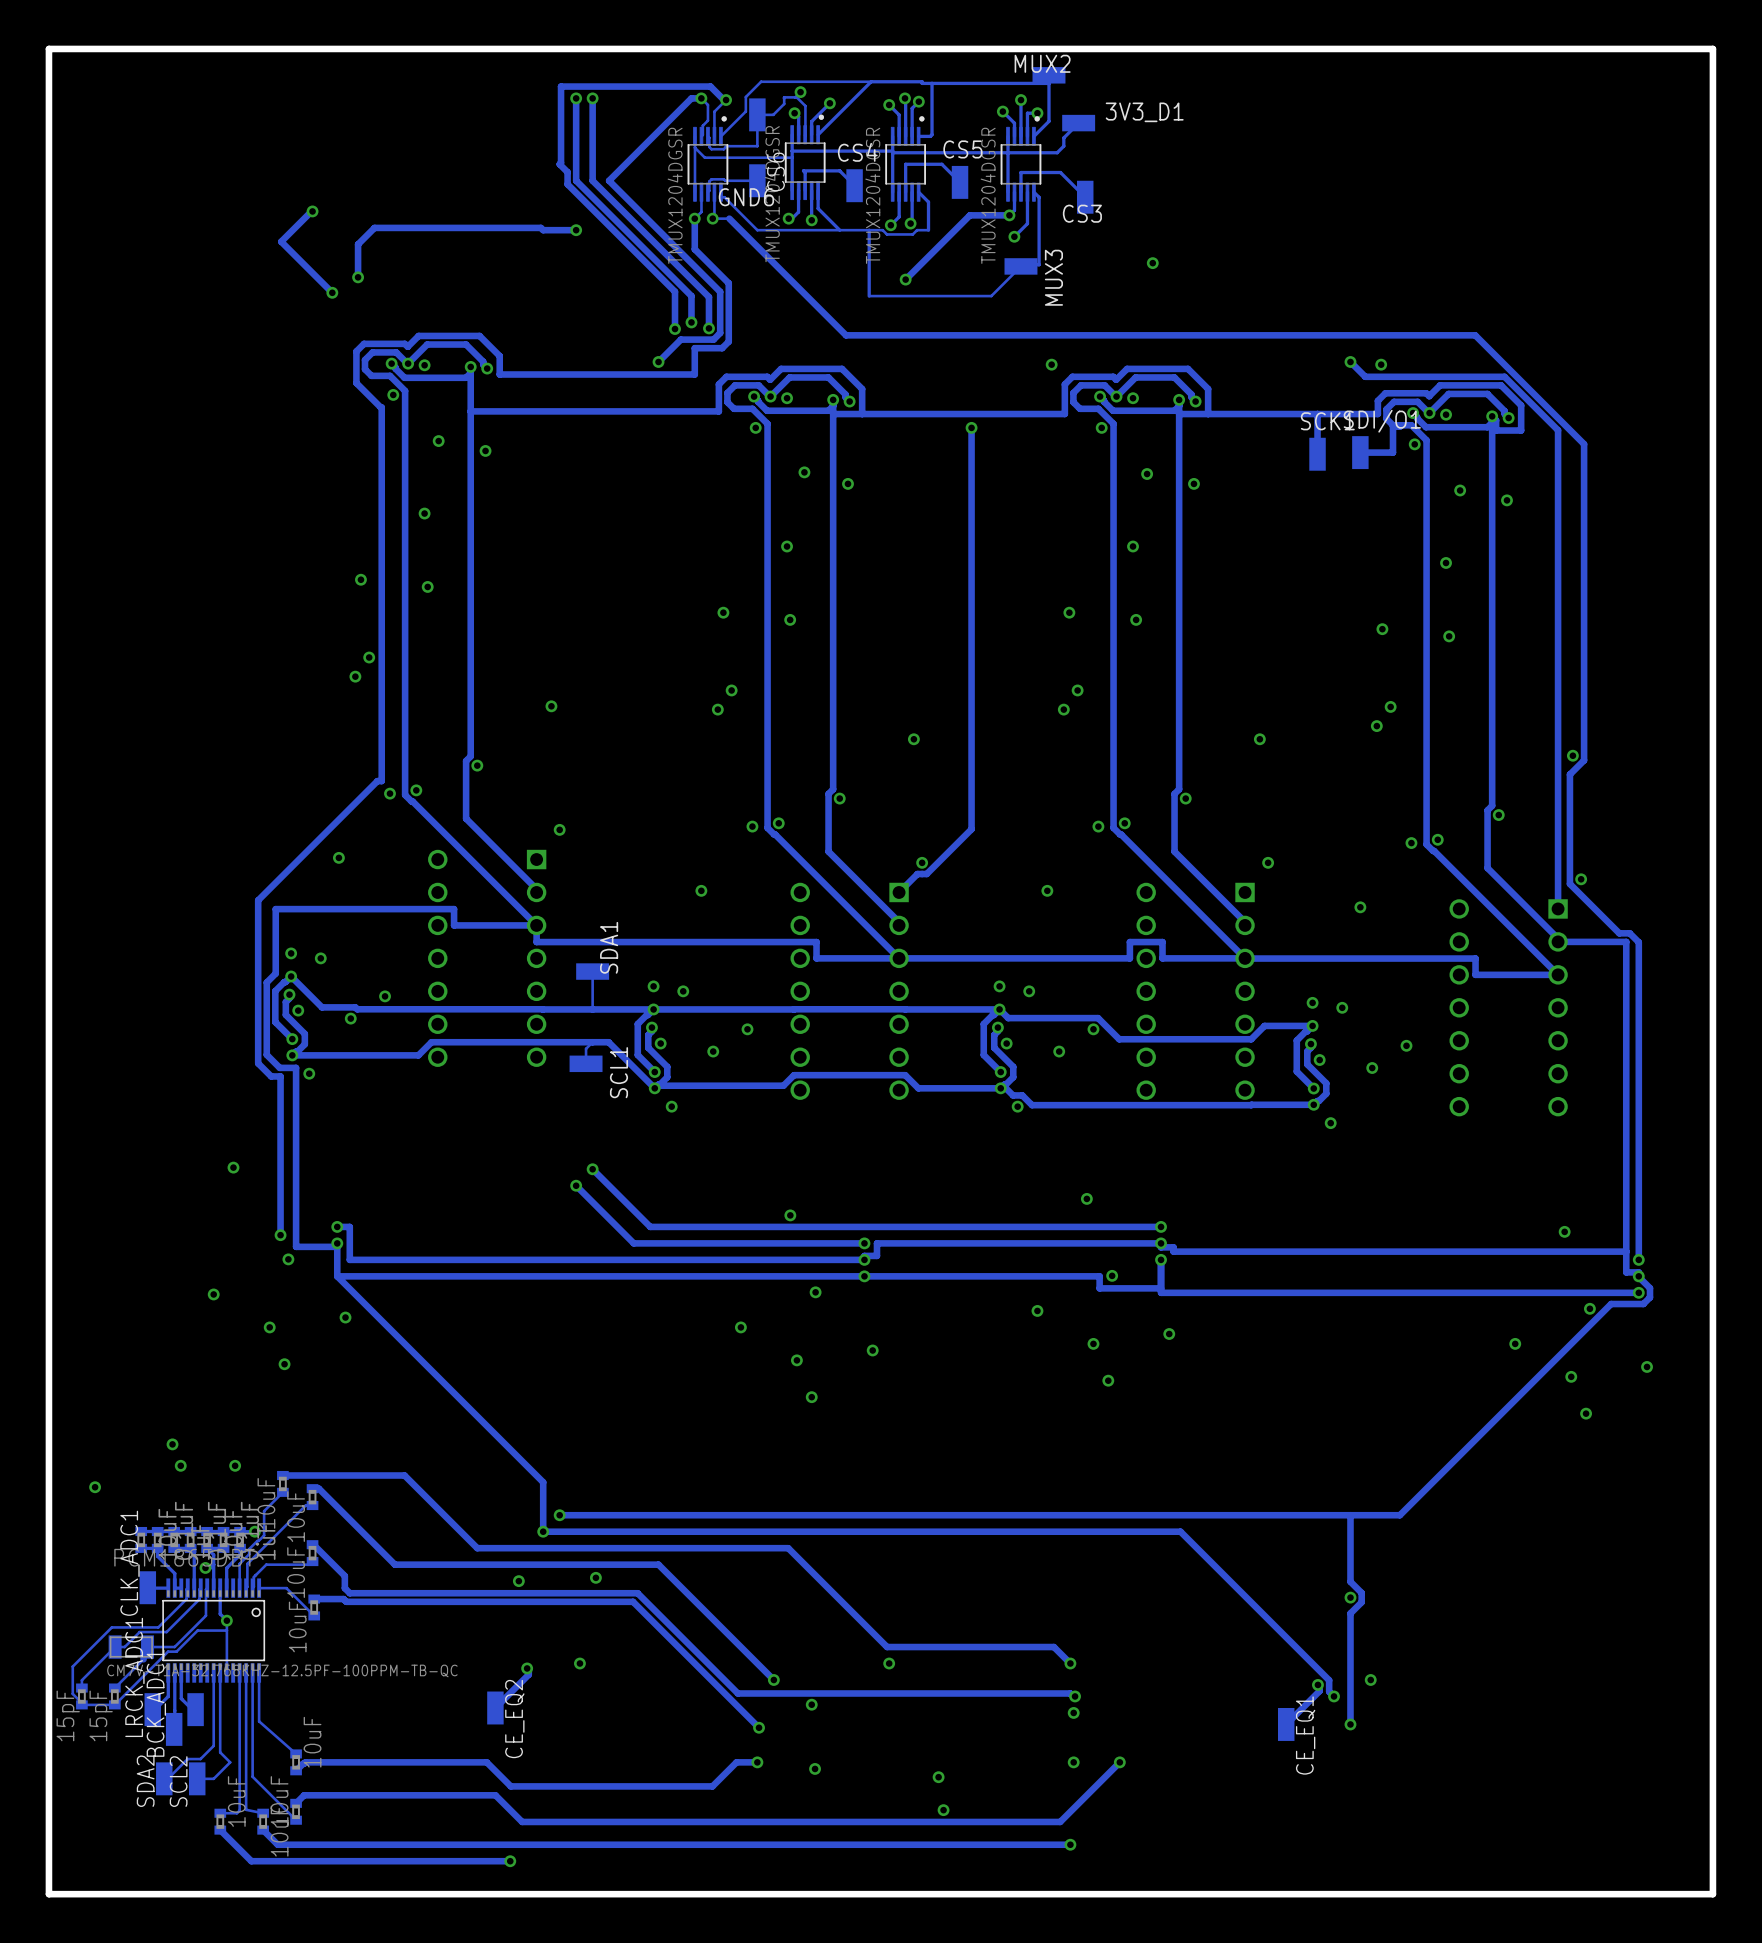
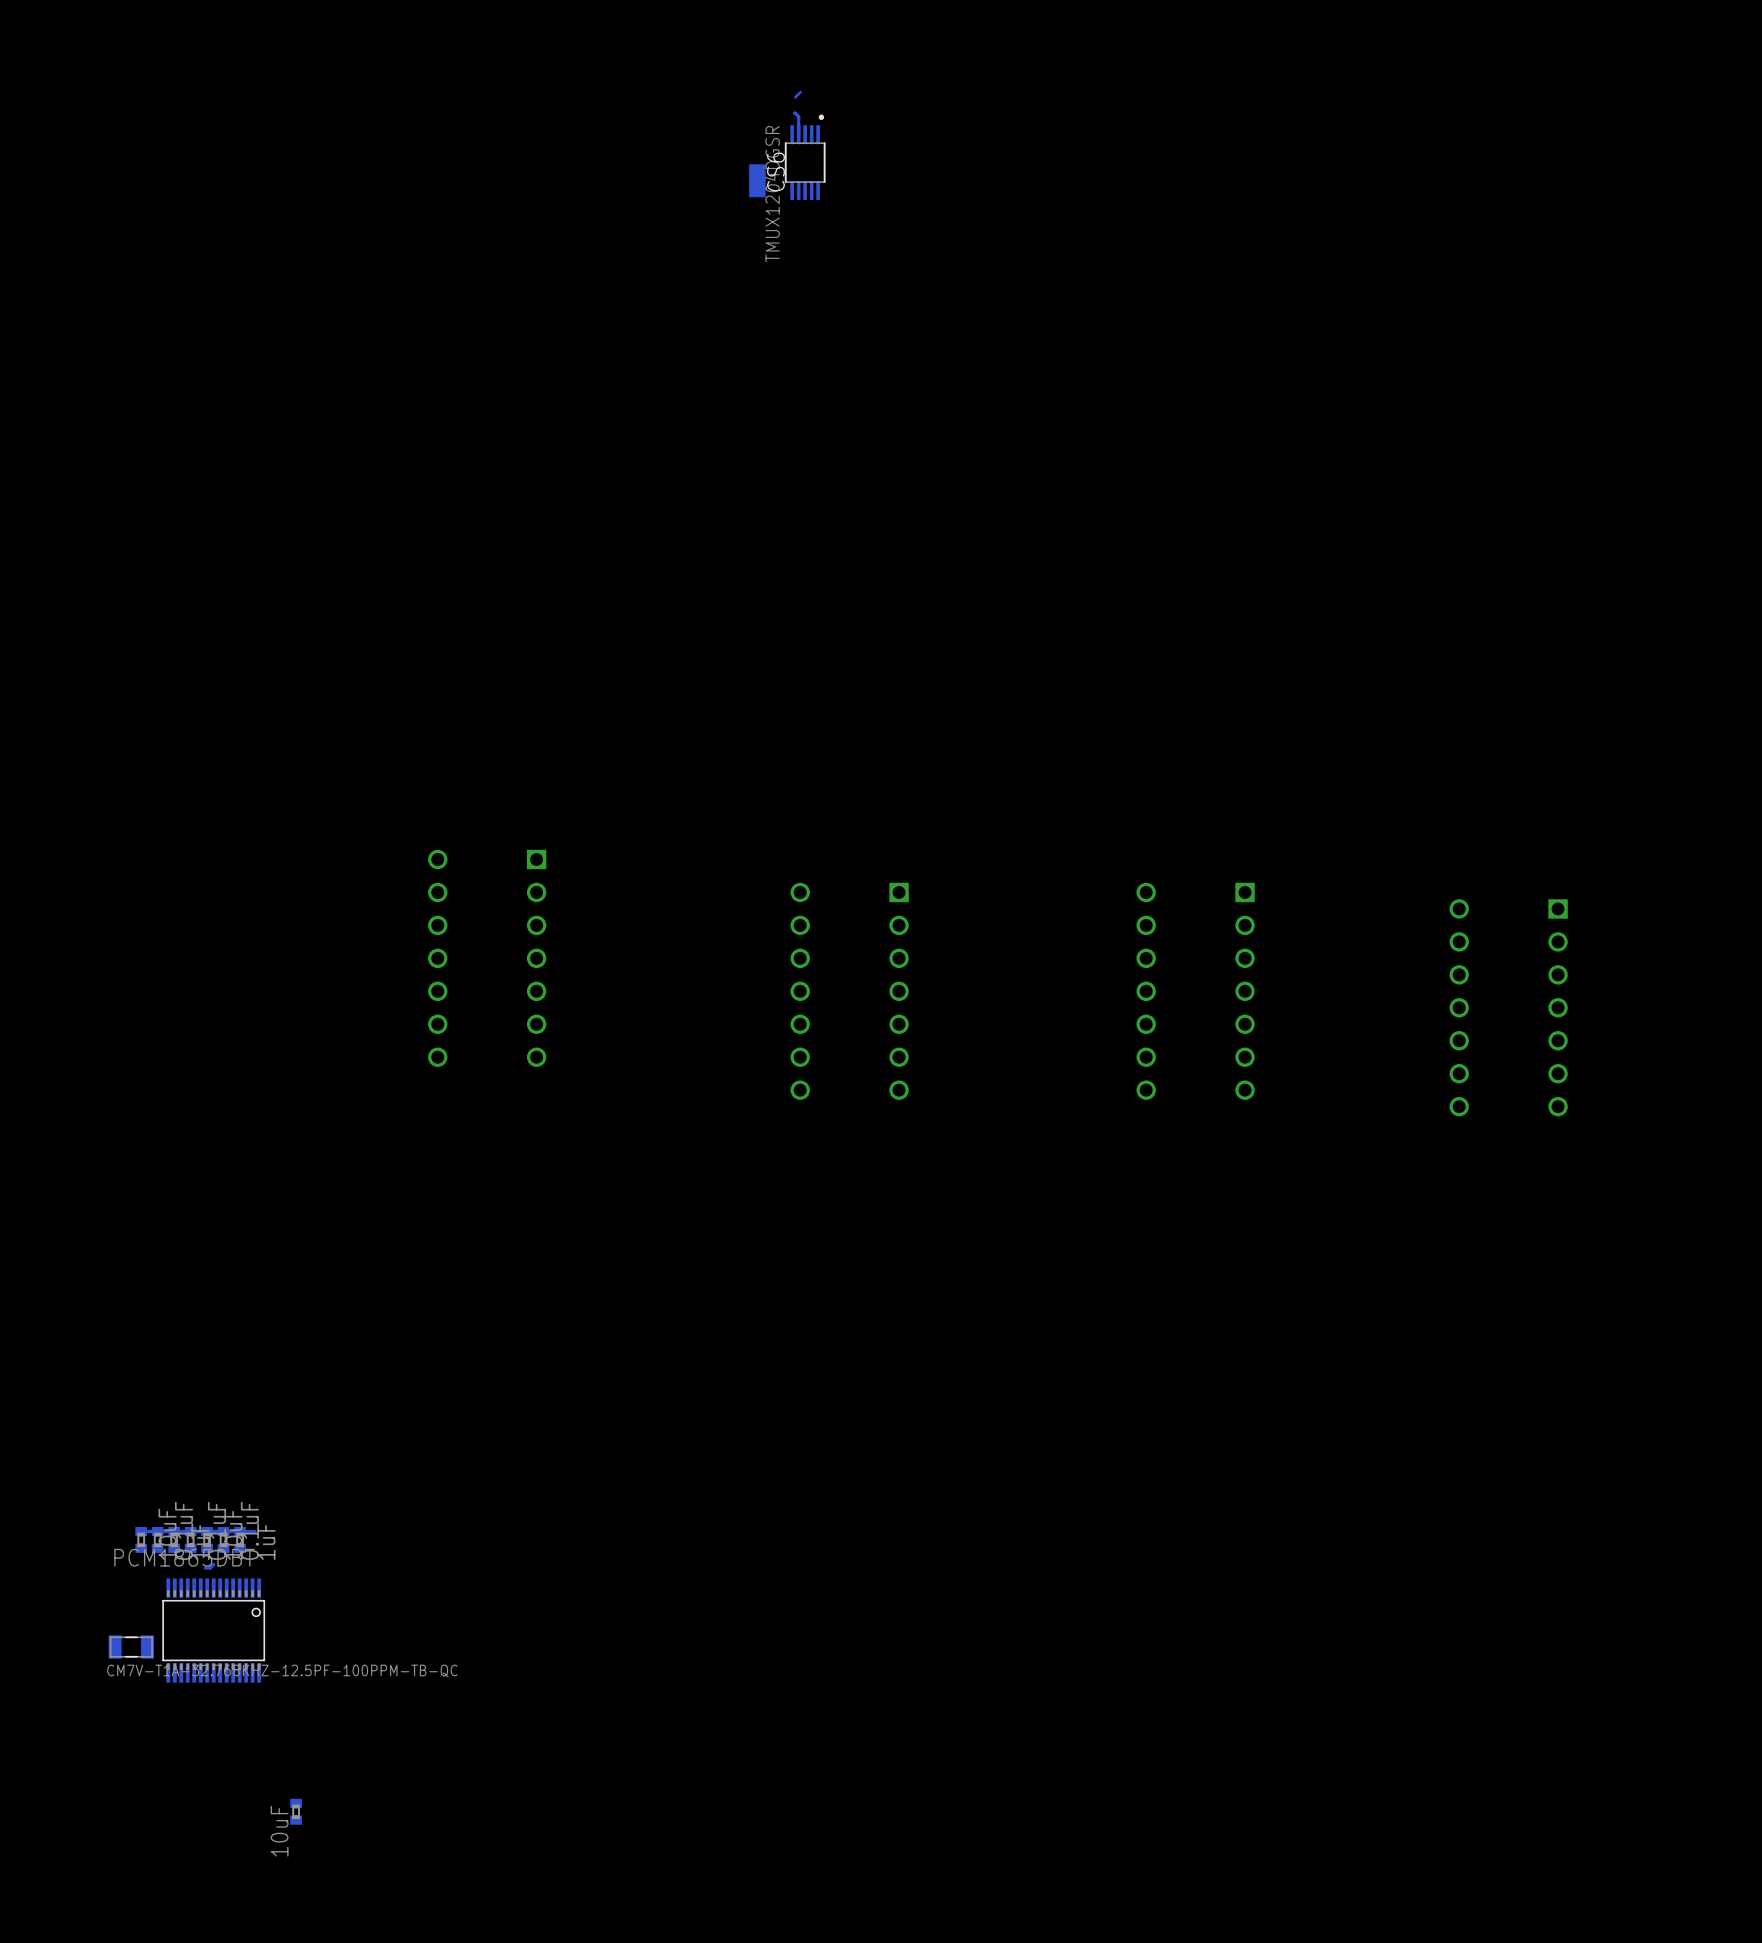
board edge: (1712, 48) (1712, 1894) (48, 1894) (48, 48) (1712, 48) -> none
track: (1048, 75) (1048, 121) (1033, 136) -> none
MUX2: (1048, 75) -> none
track: (871, 81) (761, 81) (745, 97) (745, 111) (720, 136) -> none
track: (871, 81) (1048, 83) -> none
track: (871, 81) (818, 134) -> none
track: (932, 83) (932, 134) (918, 136) -> none
via: (800, 92) -> none
track: (576, 98) (576, 180) (691, 296) (691, 322) -> none
via: (576, 98) -> none
track: (592, 98) (592, 180) (708, 297) (708, 328) -> none
via: (592, 98) -> none
via: (701, 98) -> none
track: (784, 98) (784, 103) (773, 114) (757, 114) (757, 146) (726, 146) (723, 149) (711, 149) (709, 147) (707, 136) -> none
track: (784, 98) (796, 97) (805, 106) (805, 134) -> none
track: (905, 98) (905, 136) -> none
via: (905, 98) -> none
via: (726, 100) -> none
track: (1020, 100) (1020, 136) -> none
via: (1020, 100) -> none
track: (918, 101) (912, 108) (912, 136) -> none
via: (918, 101) -> none
track: (829, 103) (811, 121) (811, 134) -> none
via: (829, 103) -> none
track: (889, 104) (899, 114) (899, 136) -> none
via: (889, 104) -> none
track: (1002, 111) (1014, 123) (1014, 136) -> none
via: (1002, 111) -> none
via: (794, 113) -> none
track: (1037, 113) (1027, 113) (1027, 136) -> none
via: (1037, 113) -> none
GND6: (757, 114) -> none
track: (1078, 123) (1063, 137) (1063, 146) (1057, 152) (892, 152) -> none
3V3_D1: (1078, 123) -> none
track: (792, 134) (792, 190) -> none
track: (694, 136) (694, 192) -> none
track: (701, 136) (702, 125) (707, 120) (707, 104) (701, 98) (691, 98) (609, 180) (720, 291) (720, 333) (713, 339) (680, 339) (658, 361) -> none
track: (714, 136) (714, 111) (726, 100) (710, 86) (561, 86) (559, 164) (567, 172) (567, 184) (675, 291) (675, 329) -> none
track: (892, 136) (892, 192) -> none
track: (1008, 136) (1008, 192) -> none
track: (694, 147) (704, 157) (792, 157) -> none
track: (892, 151) (792, 151) -> none
part: TMUX1204DGSR (707, 158) -> none
part: TMUX1204DGSR (905, 158) -> none
part: TMUX1204DGSR (1020, 158) -> none
track: (757, 180) (711, 179) (709, 181) (707, 192) -> none
track: (960, 182) (941, 164) (905, 164) (905, 192) -> none
CS5: (960, 182) -> none
track: (854, 185) (839, 170) (803, 170) (805, 172) (805, 190) -> none
CS4: (854, 185) -> none
track: (798, 190) (798, 212) (791, 218) (788, 218) -> none
track: (811, 190) (811, 220) -> none
track: (818, 190) (818, 208) (839, 230) -> none
track: (701, 192) (701, 211) (694, 218) (694, 249) (728, 283) (728, 341) (722, 348) (694, 348) (694, 374) (499, 374) (499, 356) (479, 335) (418, 335) (407, 346) (404, 343) (364, 343) (356, 351) (356, 383) (381, 407) (381, 781) (377, 781) (258, 900) (258, 1063) (271, 1076) (280, 1076) (280, 1235) -> none
track: (714, 192) (712, 218) -> none
track: (899, 192) (899, 216) (890, 225) -> none
track: (912, 192) (910, 223) -> none
track: (918, 192) (928, 202) (928, 230) (917, 230) (912, 234) (887, 234) (882, 230) (757, 230) (724, 197) (720, 197) (720, 192) -> none
track: (1014, 192) (1014, 210) (1009, 215) (969, 215) (905, 279) -> none
track: (1020, 192) (1020, 172) (1060, 172) (1085, 197) -> none
track: (1027, 192) (1027, 223) (1014, 236) -> none
track: (1033, 192) (1039, 197) (1039, 264) (1022, 264) (991, 296) (869, 296) (869, 230) -> none
CS3: (1085, 197) -> none
track: (312, 211) (281, 241) (332, 292) -> none
via: (312, 211) -> none
via: (1009, 215) -> none
via: (694, 218) -> none
track: (712, 218) (729, 218) (846, 335) (1475, 335) (1584, 444) (1584, 760) (1569, 774) (1569, 883) (1619, 933) (1629, 933) (1638, 942) (1638, 1259) -> none
via: (712, 218) -> none
via: (788, 218) -> none
via: (811, 220) -> none
via: (910, 223) -> none
via: (890, 225) -> none
track: (576, 230) (543, 230) (540, 227) (374, 227) (358, 244) (358, 277) -> none
via: (576, 230) -> none
via: (1014, 236) -> none
via: (1152, 263) -> none
MUX3: (1020, 266) -> none
via: (358, 277) -> none
via: (905, 279) -> none
via: (332, 292) -> none
via: (691, 322) -> none
via: (708, 328) -> none
via: (675, 329) -> none
via: (658, 361) -> none
track: (1350, 361) (1365, 376) (1504, 376) (1558, 430) (1558, 908) -> none
via: (1350, 361) -> none
track: (391, 363) (404, 377) (466, 377) (470, 373) -> none
via: (391, 363) -> none
via: (408, 363) -> none
via: (1051, 364) -> none
via: (1381, 364) -> none
via: (424, 365) -> none
track: (470, 366) (470, 756) (466, 760) (466, 818) (536, 889) (536, 892) -> none
via: (470, 366) -> none
track: (487, 368) (483, 361) (466, 344) (427, 344) (408, 363) (396, 352) (372, 352) (364, 360) (364, 369) (371, 375) (390, 375) (405, 390) (405, 795) (536, 925) -> none
via: (487, 368) -> none
via: (393, 394) -> none
track: (754, 396) (767, 410) (828, 410) (833, 406) -> none
via: (754, 396) -> none
via: (770, 396) -> none
track: (1100, 396) (1113, 410) (1174, 410) (1179, 406) -> none
via: (1100, 396) -> none
via: (1116, 396) -> none
via: (787, 398) -> none
via: (1133, 398) -> none
track: (833, 399) (833, 789) (828, 793) (828, 851) (899, 922) (899, 925) -> none
via: (833, 399) -> none
track: (1179, 399) (1179, 789) (1174, 793) (1174, 851) (1245, 922) (1245, 925) -> none
via: (1179, 399) -> none
track: (849, 401) (845, 394) (828, 377) (789, 377) (770, 396) (758, 385) (735, 385) (727, 392) (727, 402) (734, 408) (752, 408) (767, 423) (767, 827) (899, 958) -> none
via: (849, 401) -> none
track: (1195, 401) (1191, 394) (1174, 377) (1135, 377) (1116, 396) (1104, 385) (1081, 385) (1073, 392) (1073, 402) (1079, 408) (1098, 408) (1113, 423) (1113, 827) (1245, 958) (1162, 958) (1162, 942) (1129, 942) (1129, 958) (816, 958) (816, 942) (536, 942) (536, 925) -> none
via: (1195, 401) -> none
track: (470, 411) (718, 411) (718, 384) (726, 376) (767, 376) (770, 379) (781, 368) (842, 368) (862, 389) (862, 414) -> none
track: (1413, 413) (1426, 427) (1487, 427) (1492, 422) -> none
via: (1413, 413) -> none
via: (1429, 413) -> none
track: (1179, 414) (1377, 414) (1377, 400) (1385, 393) (1426, 393) (1429, 396) (1440, 385) (1501, 385) (1521, 405) (1521, 430) (1496, 430) (1496, 420) (1492, 416) (1492, 805) (1487, 810) (1487, 868) (1558, 938) (1558, 941) (1626, 941) (1626, 1272) (1638, 1272) (1638, 1276) (1650, 1288) (1650, 1297) (1643, 1304) (1611, 1304) (1399, 1515) (559, 1515) -> none
track: (1208, 414) (1208, 389) (1188, 368) (1127, 368) (1116, 379) (1113, 376) (1072, 376) (1064, 384) (1064, 414) (833, 414) -> none
track: (1317, 414) (1317, 454) -> none
via: (1446, 414) -> none
via: (1492, 416) -> none
track: (1508, 417) (1504, 411) (1487, 393) (1448, 393) (1429, 413) (1417, 401) (1394, 401) (1386, 409) (1386, 418) (1393, 425) (1411, 425) (1426, 440) (1426, 844) (1558, 974) (1475, 974) (1475, 958) (1245, 958) -> none
via: (1508, 417) -> none
track: (1399, 425) (1393, 426) (1393, 452) (1360, 452) -> none
via: (755, 427) -> none
track: (971, 427) (971, 829) (926, 874) (917, 874) (899, 892) -> none
via: (971, 427) -> none
via: (1101, 427) -> none
via: (438, 441) -> none
via: (1414, 444) -> none
via: (485, 450) -> none
SDI/O1: (1360, 452) -> none
SCK1: (1317, 454) -> none
via: (804, 472) -> none
via: (1147, 474) -> none
via: (847, 483) -> none
via: (1193, 483) -> none
via: (1460, 490) -> none
via: (1506, 500) -> none
via: (424, 513) -> none
via: (787, 546) -> none
via: (1133, 546) -> none
via: (1446, 562) -> none
via: (360, 579) -> none
via: (427, 586) -> none
via: (723, 612) -> none
via: (1069, 612) -> none
via: (790, 619) -> none
via: (1136, 619) -> none
via: (1382, 629) -> none
via: (1449, 636) -> none
via: (369, 657) -> none
via: (355, 676) -> none
via: (731, 690) -> none
via: (1077, 690) -> none
via: (551, 706) -> none
via: (1390, 706) -> none
via: (717, 709) -> none
via: (1063, 709) -> none
via: (1376, 726) -> none
via: (913, 739) -> none
via: (1259, 739) -> none
via: (1572, 755) -> none
via: (477, 765) -> none
via: (416, 790) -> none
via: (389, 793) -> none
via: (839, 798) -> none
via: (1185, 798) -> none
via: (1498, 815) -> none
via: (778, 823) -> none
via: (1124, 823) -> none
via: (752, 826) -> none
via: (1098, 826) -> none
via: (559, 829) -> none
via: (1437, 839) -> none
via: (1411, 843) -> none
via: (338, 857) -> none
via: (922, 862) -> none
via: (1268, 862) -> none
via: (1581, 879) -> none
via: (701, 890) -> none
via: (1047, 890) -> none
via: (1360, 907) -> none
track: (536, 925) (454, 925) (454, 909) (275, 909) (275, 973) (266, 982) (266, 1054) (279, 1067) (296, 1067) (296, 1246) (337, 1246) -> none
via: (291, 953) -> none
via: (320, 958) -> none
track: (592, 971) (592, 1009) -> none
SDA1: (592, 971) -> none
via: (291, 976) -> none
via: (653, 986) -> none
via: (999, 986) -> none
via: (683, 991) -> none
via: (1029, 991) -> none
track: (289, 994) (289, 998) (285, 1002) (285, 1014) (304, 1033) (304, 1044) (292, 1055) (418, 1055) (431, 1042) (608, 1042) (654, 1088) (667, 1077) (667, 1066) (648, 1047) (648, 1034) (651, 1031) (651, 1027) -> none
via: (289, 994) -> none
via: (385, 996) -> none
via: (1312, 1002) -> none
via: (1342, 1007) -> none
track: (542, 1009) (357, 1009) (355, 1007) (322, 1007) (291, 976) (275, 991) (275, 1022) (292, 1039) -> none
track: (653, 1009) (637, 1024) (637, 1055) (654, 1072) -> none
via: (653, 1009) -> none
track: (793, 1009) (542, 1009) -> none
track: (905, 1009) (794, 1009) -> none
track: (999, 1009) (983, 1024) (983, 1055) (1000, 1072) -> none
track: (999, 1009) (1008, 1018) (1098, 1018) (1119, 1039) (1251, 1039) (1264, 1025) (1312, 1025) (1296, 1040) (1296, 1071) (1313, 1088) -> none
track: (999, 1009) (905, 1009) -> none
via: (999, 1009) -> none
via: (298, 1010) -> none
via: (350, 1018) -> none
via: (1312, 1025) -> none
via: (651, 1027) -> none
track: (997, 1027) (997, 1031) (994, 1034) (994, 1047) (1013, 1066) (1013, 1077) (1000, 1088) (918, 1088) (905, 1075) (794, 1075) (783, 1085) (657, 1085) -> none
via: (997, 1027) -> none
via: (747, 1029) -> none
via: (1093, 1029) -> none
via: (292, 1039) -> none
track: (592, 1042) (586, 1048) (586, 1063) -> none
via: (660, 1043) -> none
via: (1006, 1043) -> none
track: (1310, 1044) (1310, 1047) (1307, 1051) (1307, 1064) (1326, 1083) (1326, 1093) (1313, 1104) (1032, 1105) (1022, 1095) (1013, 1095) (1003, 1085) -> none
via: (1310, 1044) -> none
via: (1406, 1045) -> none
via: (713, 1051) -> none
via: (1059, 1051) -> none
via: (292, 1055) -> none
via: (1319, 1060) -> none
SCL1: (586, 1063) -> none
via: (1372, 1068) -> none
via: (654, 1072) -> none
via: (1000, 1072) -> none
via: (309, 1073) -> none
via: (654, 1088) -> none
via: (1000, 1088) -> none
via: (1313, 1088) -> none
via: (1313, 1104) -> none
via: (671, 1106) -> none
via: (1017, 1106) -> none
via: (1330, 1123) -> none
via: (233, 1167) -> none
track: (592, 1169) (650, 1226) (1161, 1226) -> none
via: (592, 1169) -> none
track: (576, 1185) (633, 1243) (864, 1243) -> none
via: (576, 1185) -> none
via: (1086, 1198) -> none
via: (790, 1215) -> none
track: (337, 1226) (349, 1226) (349, 1259) (864, 1259) (864, 1255) (876, 1255) (876, 1243) (1161, 1243) (1161, 1247) (1173, 1247) (1173, 1251) (1626, 1251) -> none
via: (337, 1226) -> none
via: (1161, 1226) -> none
via: (1564, 1231) -> none
via: (280, 1235) -> none
track: (337, 1243) (337, 1276) -> none
via: (337, 1243) -> none
via: (864, 1243) -> none
via: (1161, 1243) -> none
via: (288, 1259) -> none
via: (864, 1259) -> none
track: (1161, 1259) (1161, 1292) (1638, 1292) -> none
via: (1161, 1259) -> none
via: (1638, 1259) -> none
via: (1112, 1275) -> none
track: (337, 1276) (1099, 1276) (1099, 1288) (1161, 1288) -> none
track: (337, 1276) (543, 1482) (543, 1531) (1180, 1531) (1329, 1680) (1329, 1691) (1334, 1696) -> none
via: (864, 1276) -> none
via: (1638, 1276) -> none
via: (815, 1292) -> none
via: (1638, 1292) -> none
via: (213, 1294) -> none
via: (1589, 1308) -> none
via: (1037, 1310) -> none
via: (345, 1317) -> none
via: (269, 1327) -> none
via: (740, 1327) -> none
via: (1169, 1334) -> none
via: (1093, 1343) -> none
via: (1515, 1343) -> none
via: (872, 1350) -> none
via: (796, 1360) -> none
via: (284, 1364) -> none
via: (1647, 1366) -> none
via: (1571, 1376) -> none
via: (1108, 1380) -> none
via: (811, 1397) -> none
via: (1586, 1413) -> none
via: (172, 1444) -> none
via: (180, 1465) -> none
via: (235, 1465) -> none
track: (282, 1475) (404, 1475) (477, 1548) (788, 1548) (887, 1647) (1053, 1647) (1070, 1663) -> none
part: 10uF (282, 1483) -> none
via: (95, 1487) -> none
track: (312, 1488) (318, 1488) (394, 1564) (658, 1564) (773, 1679) -> none
track: (282, 1492) (264, 1511) (264, 1535) (249, 1549) (249, 1554) (239, 1563) (239, 1588) -> none
part: 10uF (312, 1497) -> none
track: (312, 1505) (305, 1505) (247, 1563) (246, 1588) -> none
via: (559, 1515) -> none
track: (1350, 1515) (1350, 1581) (1361, 1592) (1361, 1602) (1350, 1613) (1350, 1724) -> none
via: (254, 1531) -> none
via: (543, 1531) -> none
track: (312, 1544) (344, 1576) (344, 1588) (349, 1593) (637, 1593) (737, 1693) (1070, 1693) (1075, 1696) -> none
track: (141, 1548) (157, 1548) (157, 1556) (174, 1573) (174, 1588) (181, 1588) -> none
track: (174, 1548) (190, 1548) (194, 1551) (194, 1588) -> none
track: (223, 1548) (207, 1548) (213, 1554) (213, 1588) -> none
track: (240, 1548) (240, 1554) (226, 1568) (226, 1588) -> none
part: 10uF (312, 1553) -> none
track: (312, 1561) (309, 1564) (266, 1564) (253, 1577) (252, 1588) -> none
via: (205, 1567) -> none
via: (595, 1577) -> none
via: (518, 1581) -> none
track: (147, 1587) (168, 1588) -> none
CLK_ADC1: (147, 1587) -> none
track: (187, 1588) (186, 1599) (158, 1627) (111, 1627) (72, 1666) (72, 1693) (81, 1704) (114, 1704) (168, 1651) (176, 1651) (197, 1630) (226, 1630) -> none
track: (200, 1588) (199, 1599) (166, 1632) (139, 1632) (124, 1647) (115, 1647) (81, 1680) (81, 1688) -> none
track: (207, 1588) (205, 1615) (174, 1647) (147, 1647) (143, 1650) (143, 1659) (114, 1688) -> none
track: (220, 1588) (220, 1613) (226, 1620) (226, 1672) -> none
track: (259, 1588) (286, 1588) (314, 1615) -> none
via: (1350, 1597) -> none
track: (314, 1599) (343, 1599) (346, 1601) (633, 1601) (759, 1727) -> none
part: 10uF (314, 1607) -> none
via: (226, 1620) -> none
via: (579, 1663) -> none
via: (889, 1663) -> none
via: (1070, 1663) -> none
track: (527, 1668) (528, 1668) (528, 1674) (495, 1707) -> none
via: (527, 1668) -> none
track: (168, 1672) (168, 1696) (155, 1709) (152, 1709) -> none
track: (174, 1672) (174, 1729) -> none
track: (181, 1672) (181, 1698) (192, 1709) (195, 1709) -> none
track: (213, 1672) (213, 1745) (200, 1759) (187, 1759) (167, 1778) (164, 1778) -> none
track: (220, 1672) (220, 1752) (230, 1762) (213, 1778) (197, 1778) -> none
track: (239, 1672) (239, 1810) (236, 1813) (220, 1813) -> none
track: (246, 1672) (246, 1809) (263, 1813) -> none
track: (252, 1672) (252, 1776) (296, 1820) -> none
track: (259, 1672) (259, 1721) (296, 1753) -> none
via: (773, 1679) -> none
via: (1370, 1679) -> none
track: (1317, 1684) (1319, 1684) (1319, 1691) (1286, 1724) -> none
via: (1317, 1684) -> none
part: 15pF (81, 1696) -> none
part: 15pF (114, 1696) -> none
via: (1075, 1696) -> none
via: (1334, 1696) -> none
via: (811, 1704) -> none
CE_EQ2: (495, 1707) -> none
LRCK_ADC1: (152, 1709) -> none
part: (195, 1709) -> none
via: (1073, 1712) -> none
CE_EQ1: (1286, 1724) -> none
via: (1350, 1724) -> none
via: (759, 1727) -> none
BCK_ADC1: (174, 1729) -> none
part: 10uF (296, 1762) -> none
track: (757, 1762) (736, 1762) (712, 1786) (510, 1786) (486, 1762) (305, 1762) (296, 1770) -> none
via: (757, 1762) -> none
via: (1073, 1762) -> none
track: (1119, 1762) (1060, 1821) (522, 1821) (495, 1795) (304, 1795) (296, 1803) -> none
via: (1119, 1762) -> none
via: (815, 1768) -> none
via: (938, 1777) -> none
SDA2: (164, 1778) -> none
SCL2: (197, 1778) -> none
via: (943, 1810) -> none
part: 10uF (220, 1821) -> none
part: 10uF (263, 1821) -> none
track: (220, 1830) (251, 1861) (510, 1861) -> none
track: (263, 1830) (277, 1844) (1070, 1844) -> none
via: (1070, 1844) -> none
via: (510, 1861) -> none

